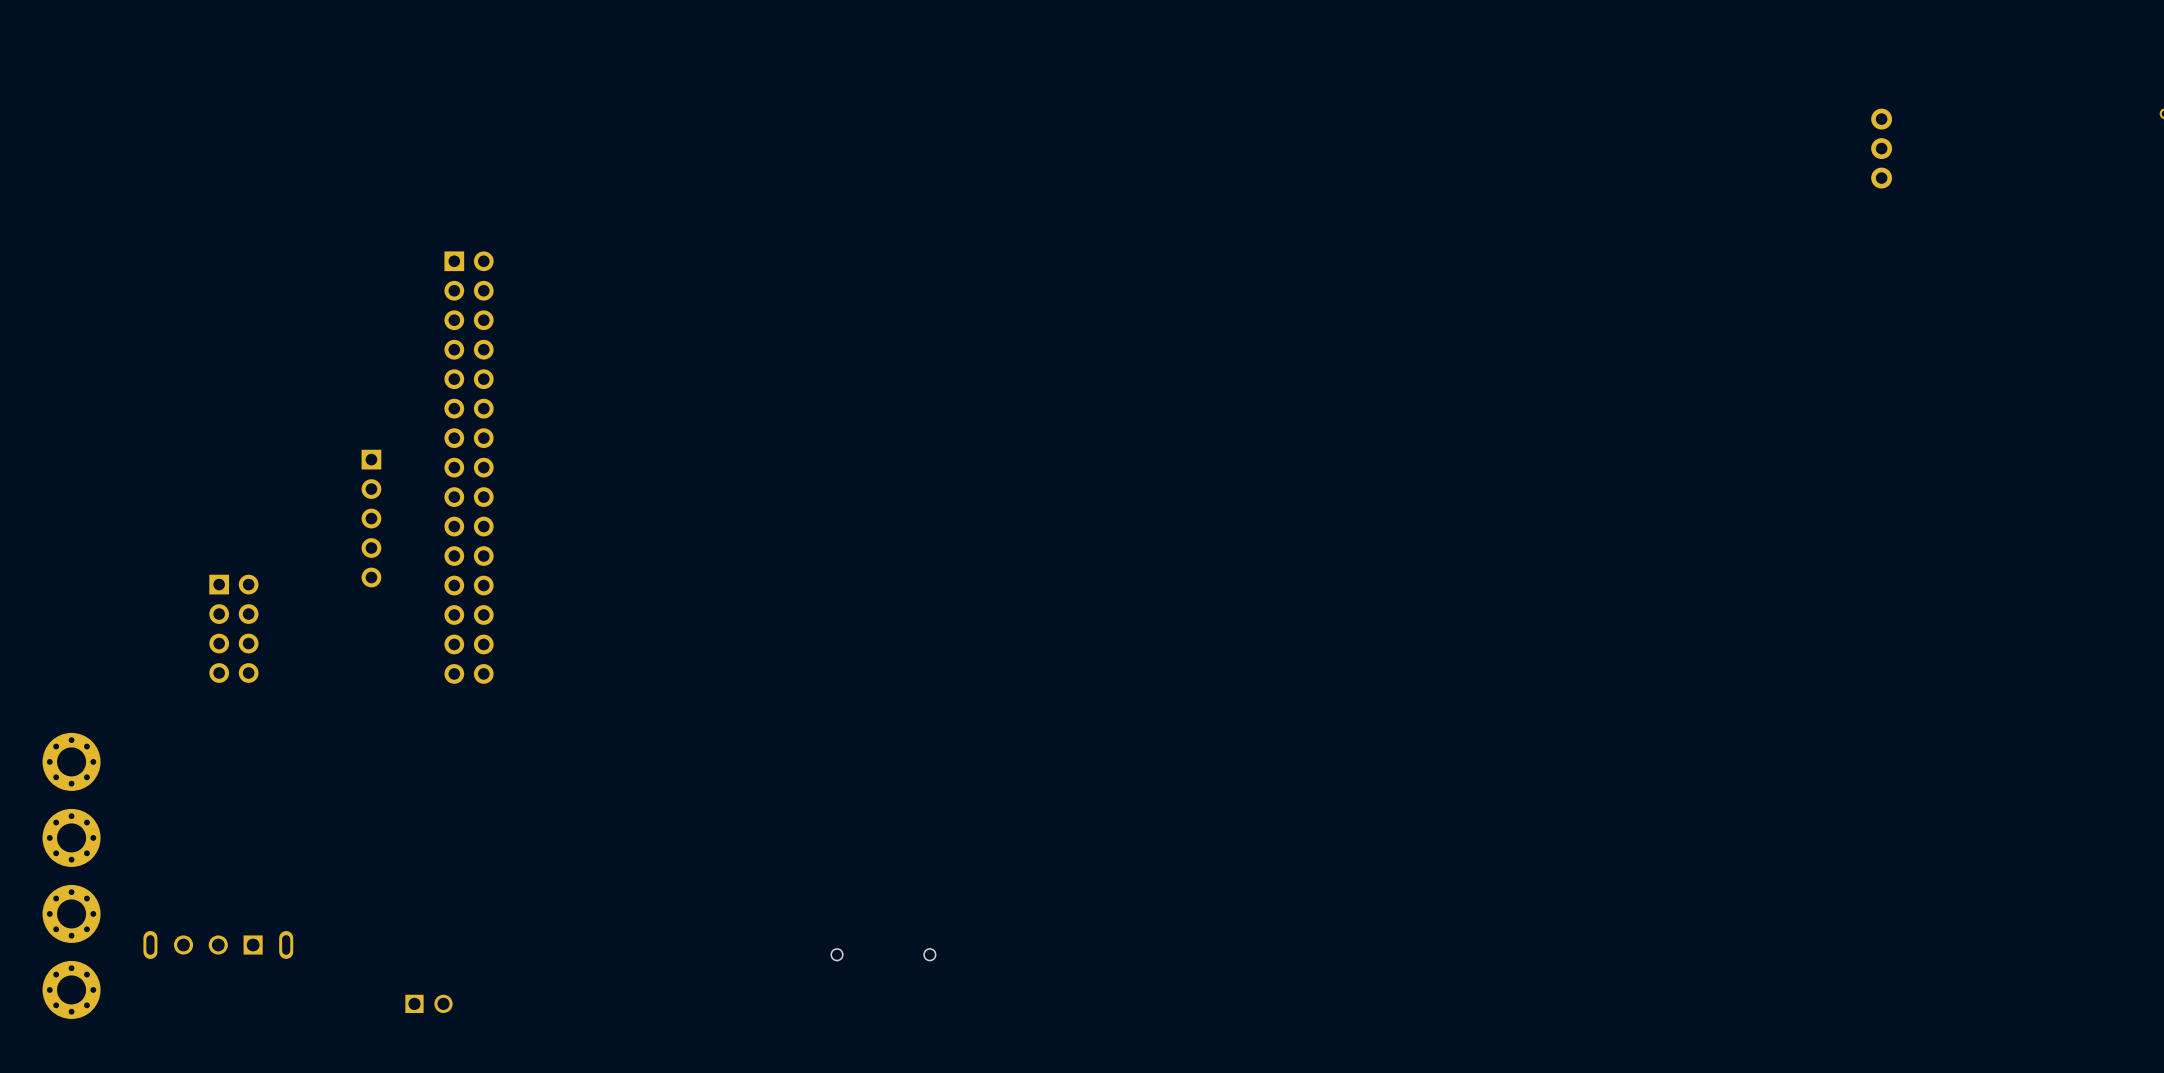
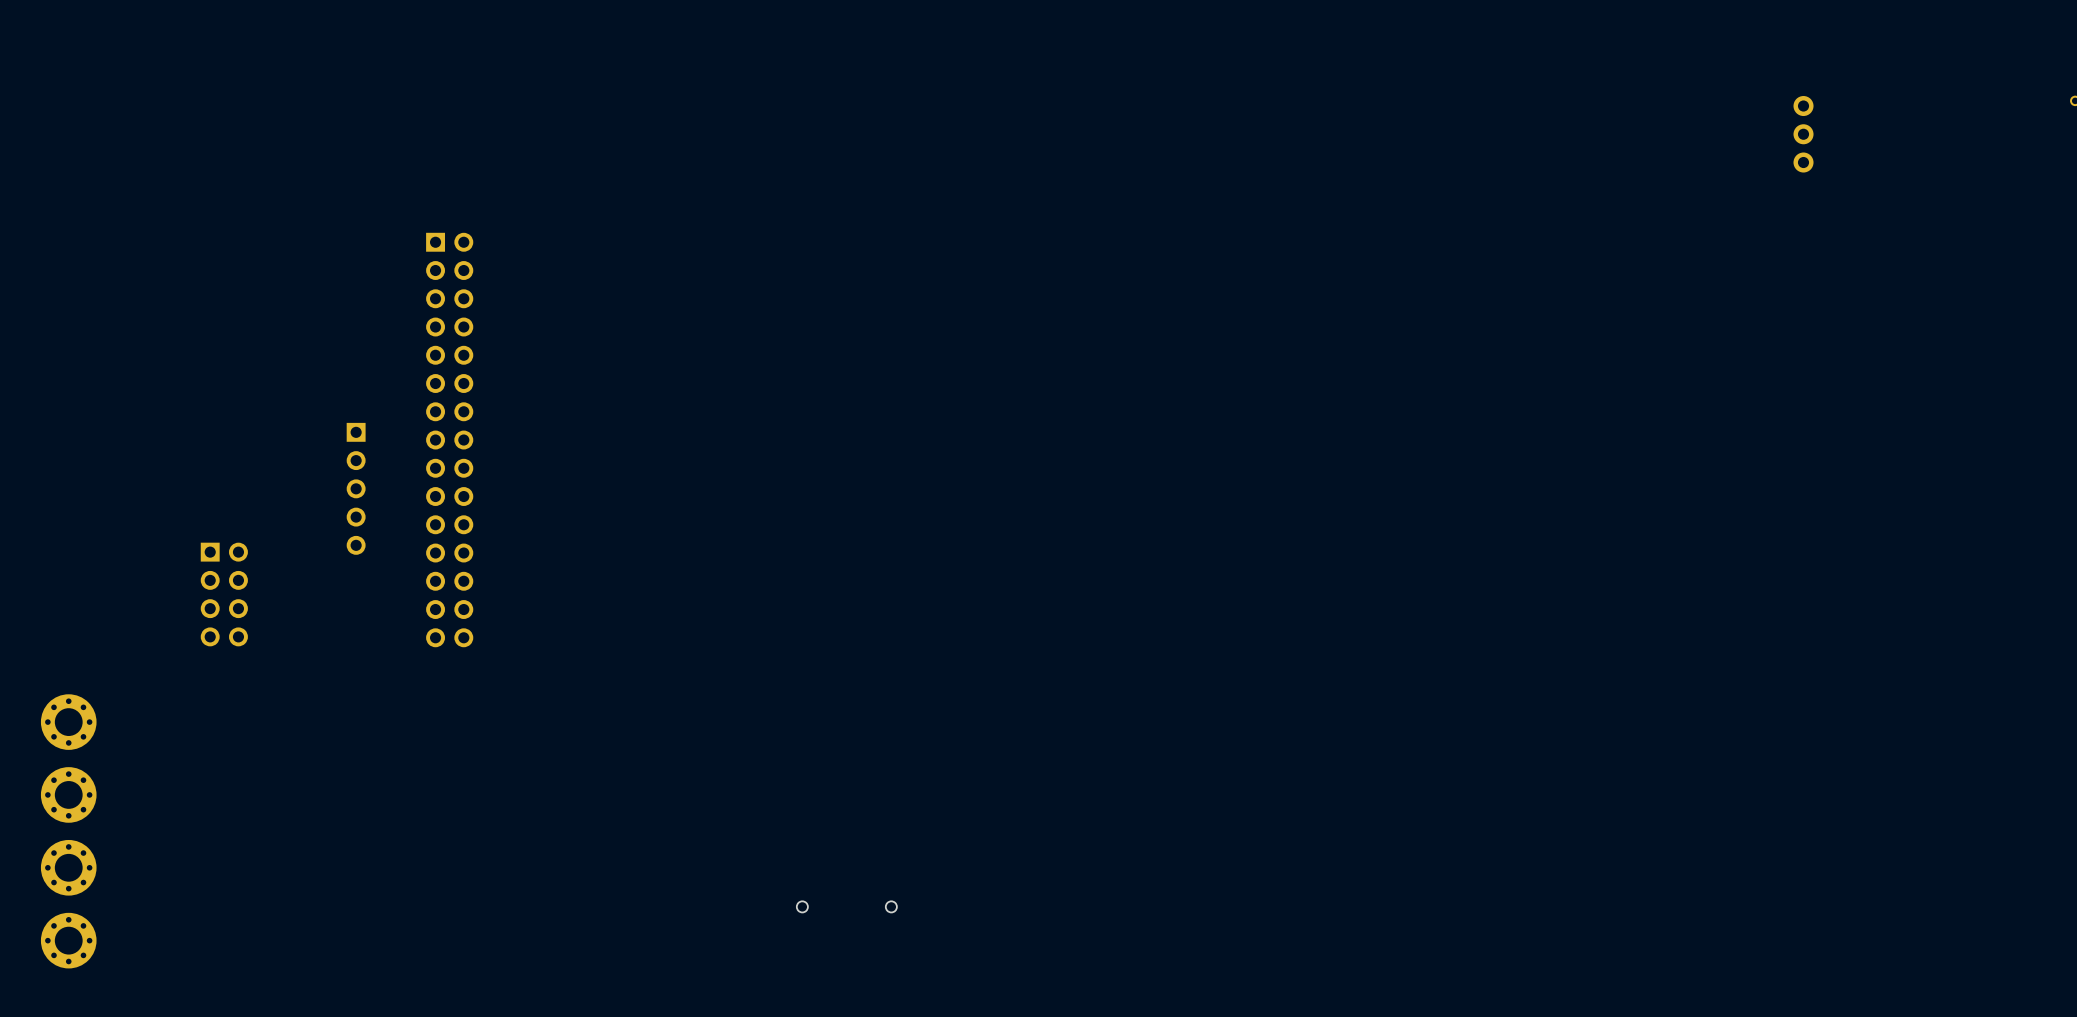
part: (218, 944) -> none
part: (428, 1003) -> none

